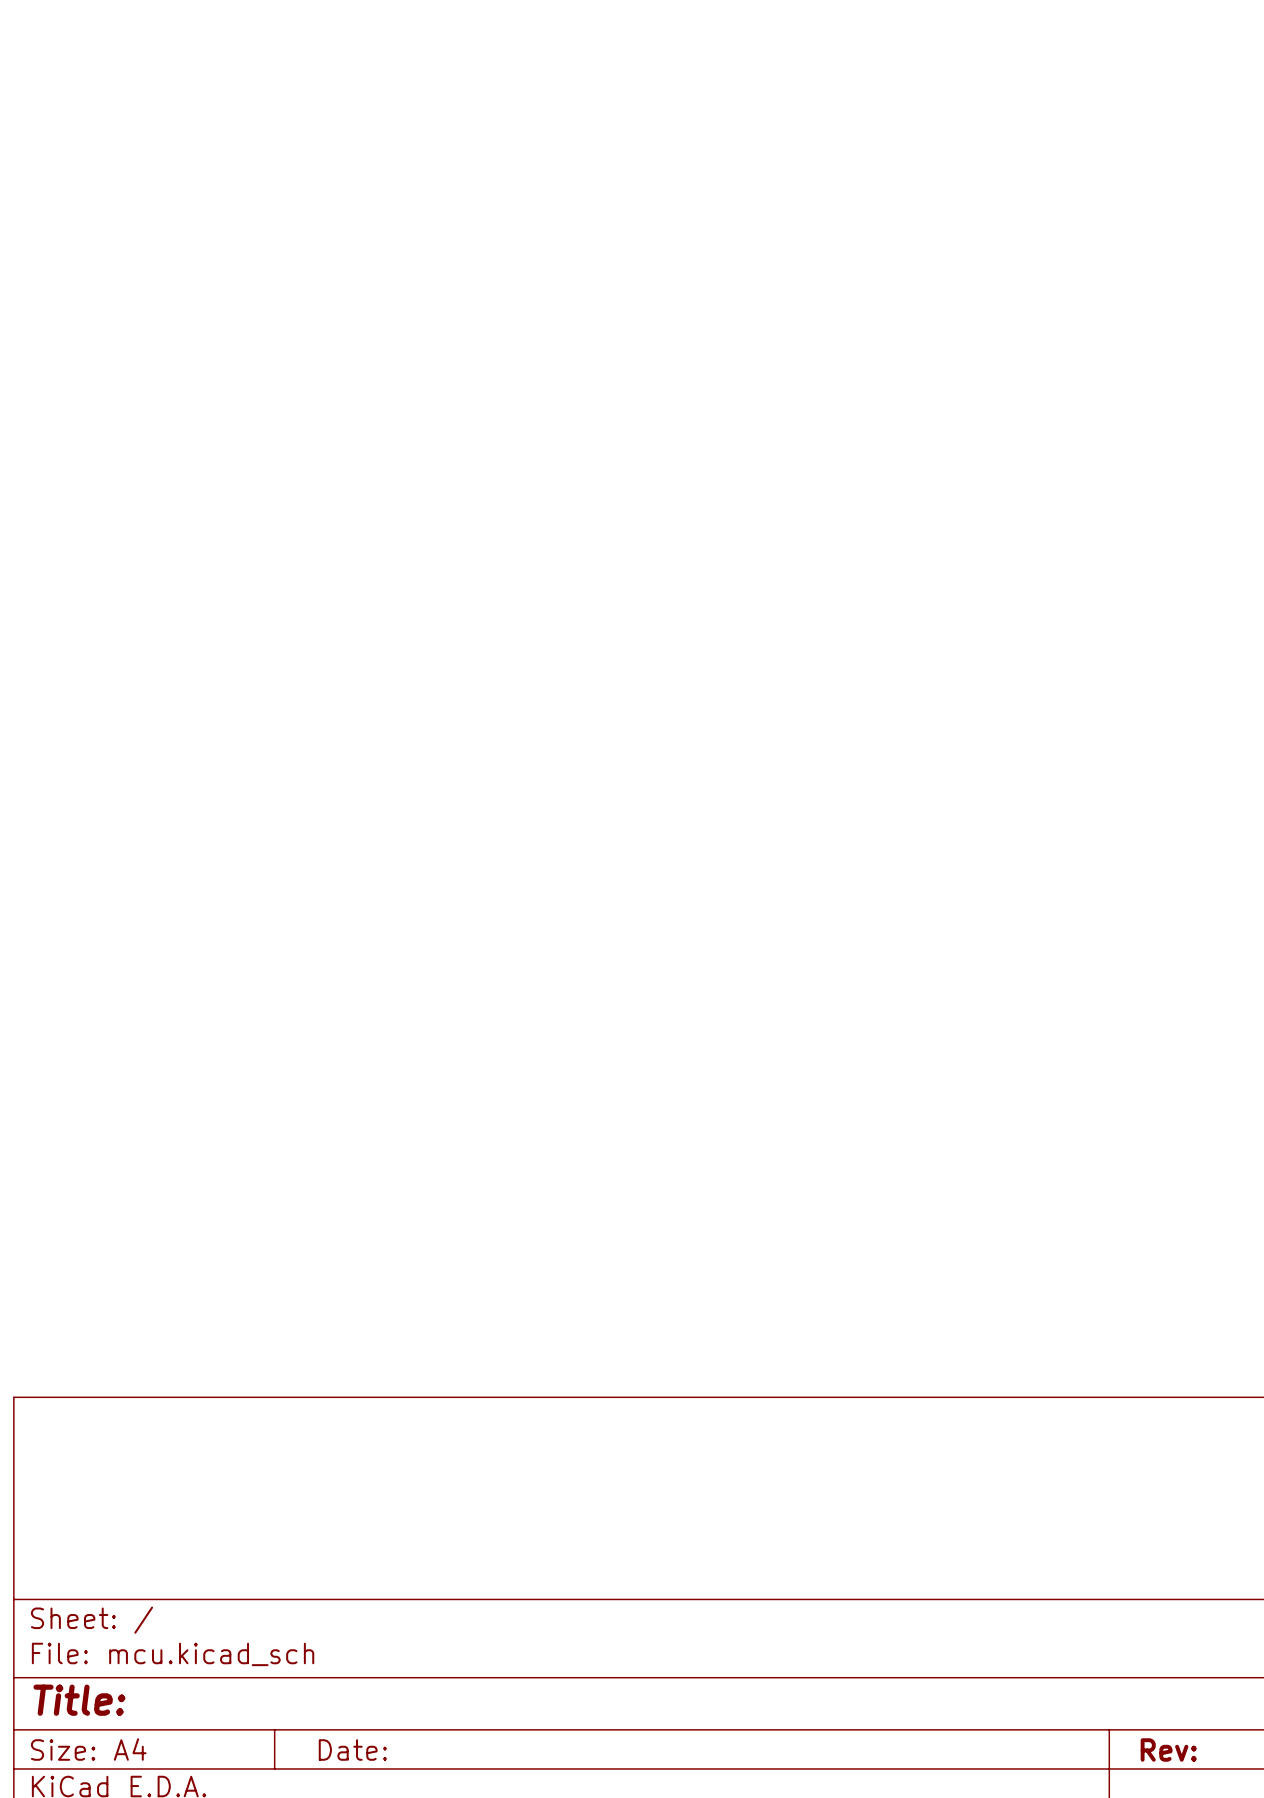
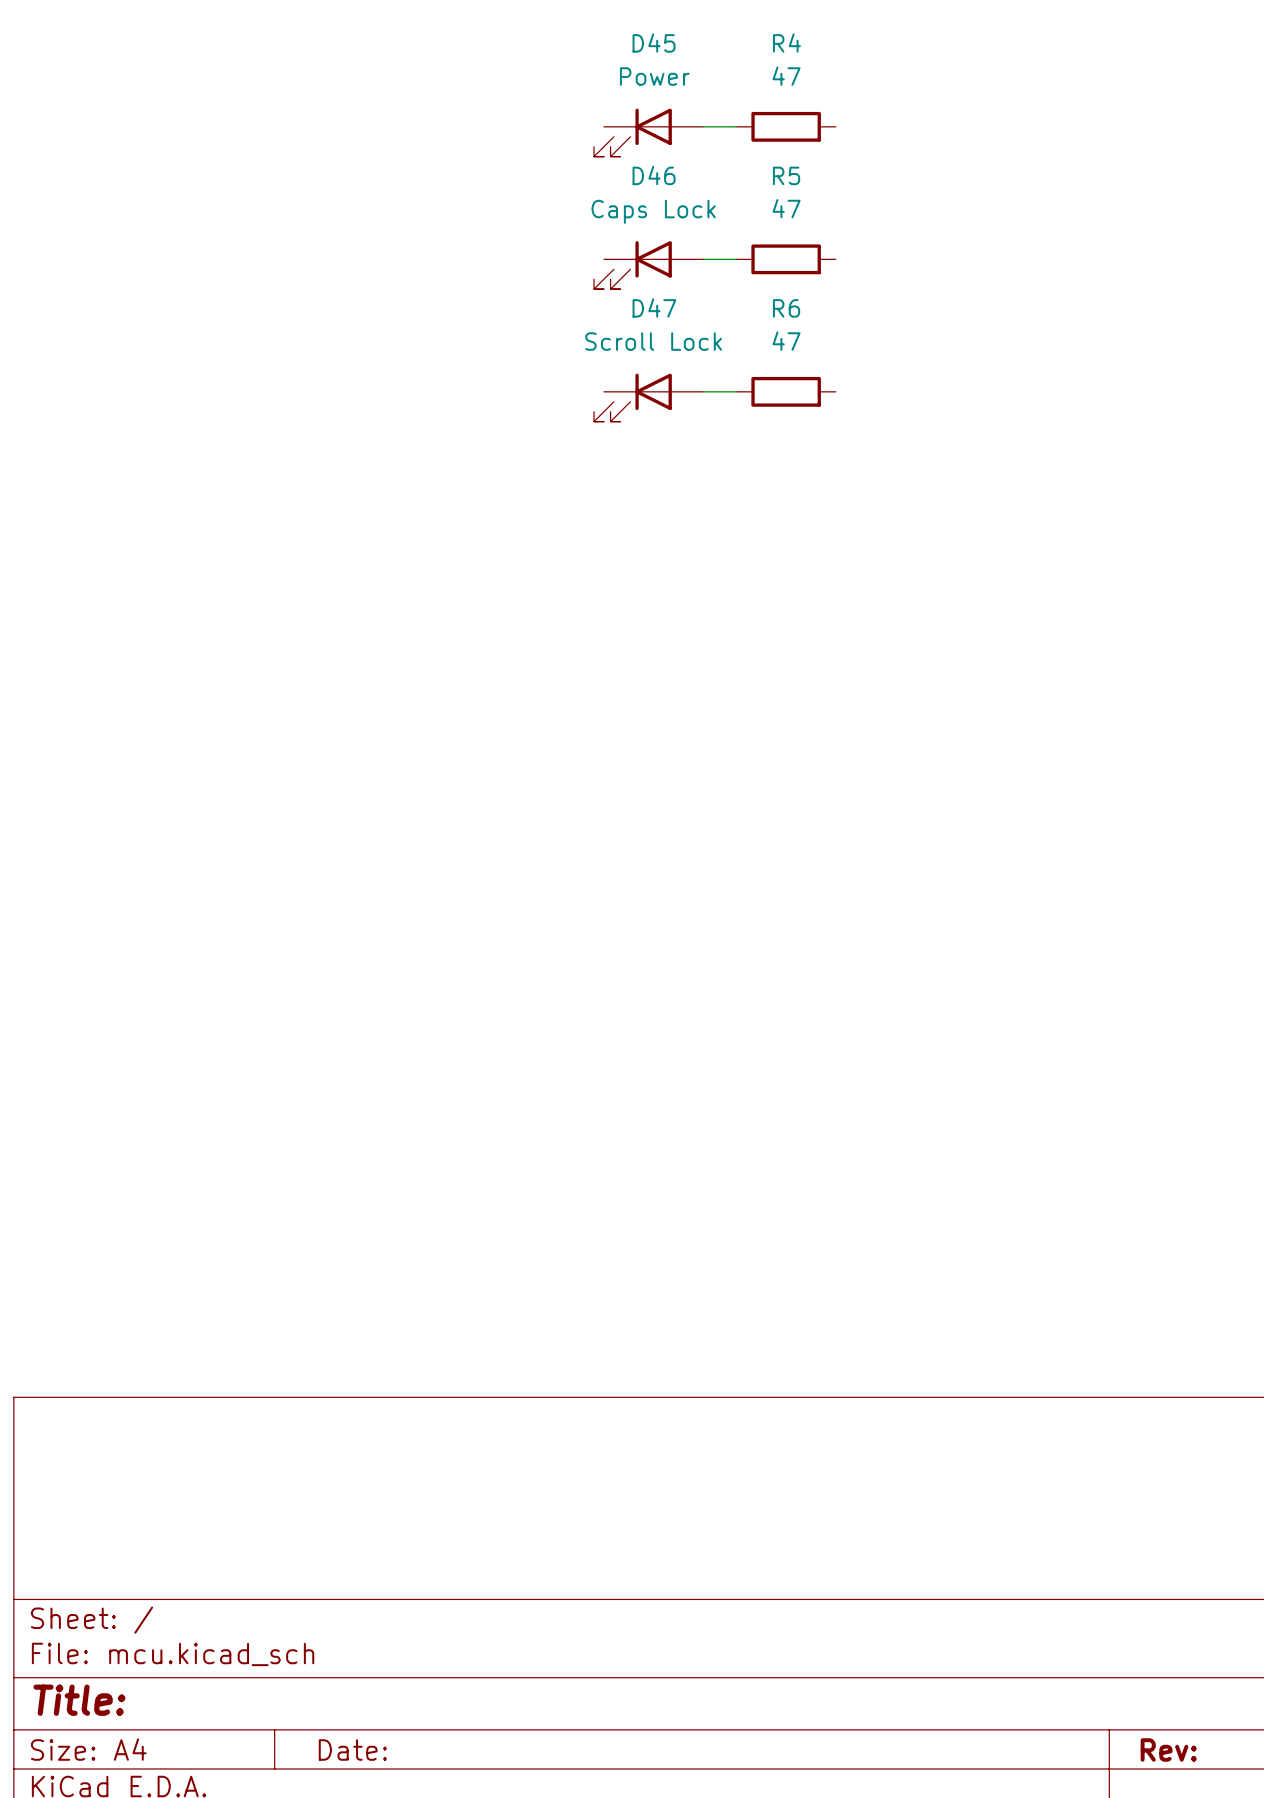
wire: none -> (703, 126) (736, 126)
R4: none -> 47 (786, 126)
D45: none -> Power (648, 132)
wire: none -> (703, 259) (736, 259)
R5: none -> 47 (786, 259)
D46: none -> Caps Lock (648, 265)
wire: none -> (703, 391) (736, 391)
R6: none -> 47 (786, 391)
D47: none -> Scroll Lock (648, 397)

